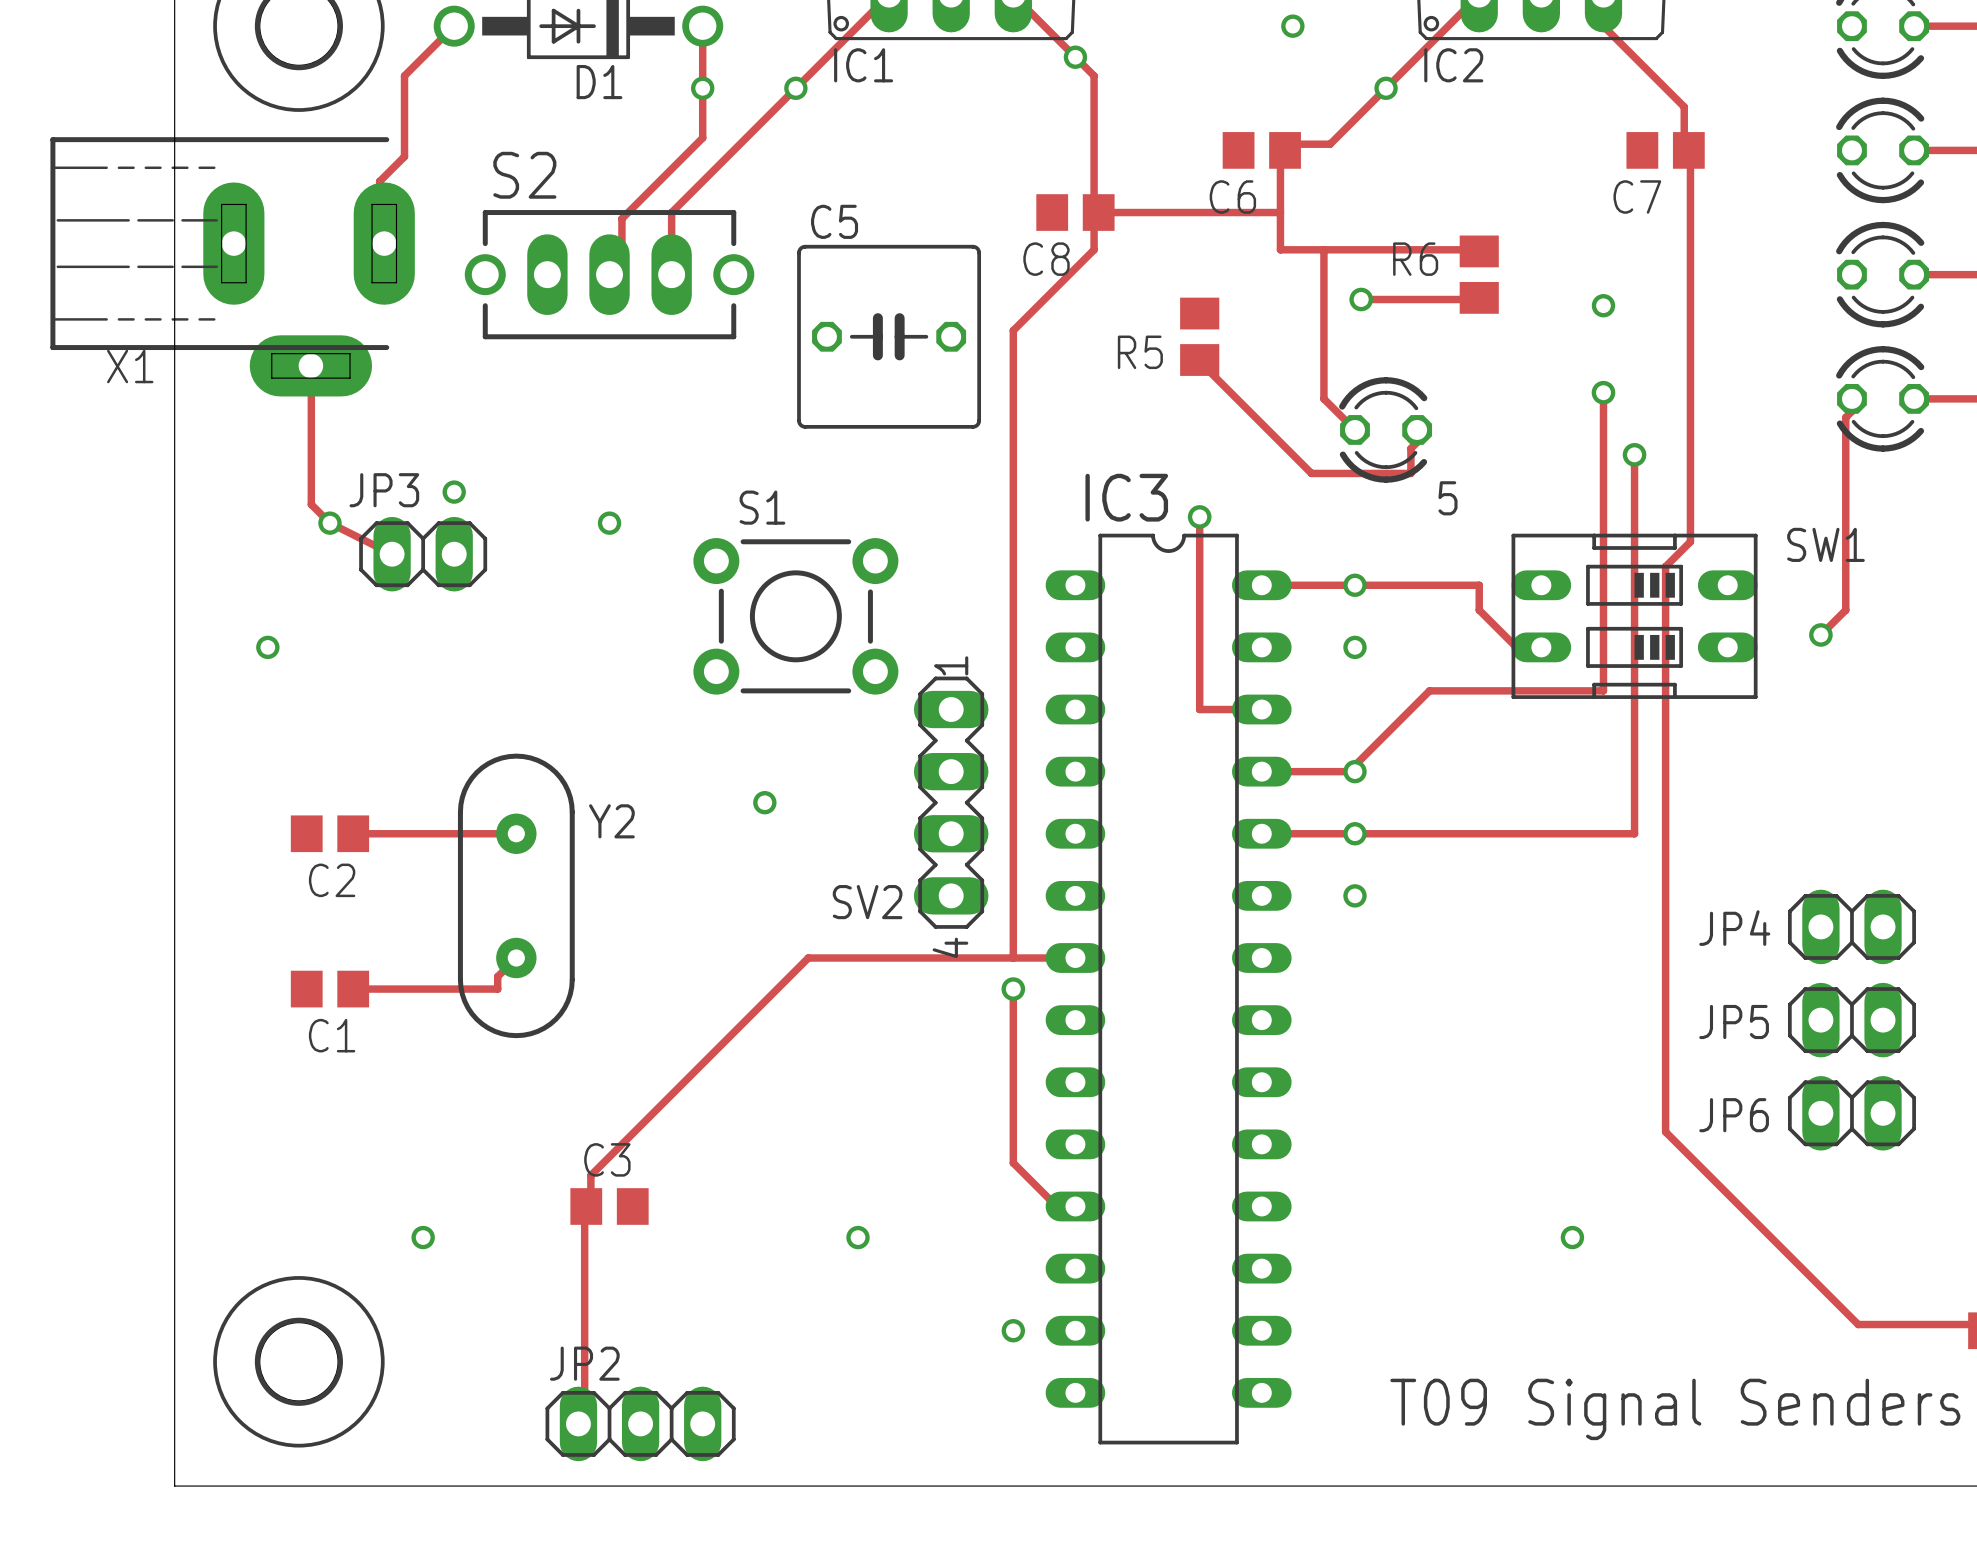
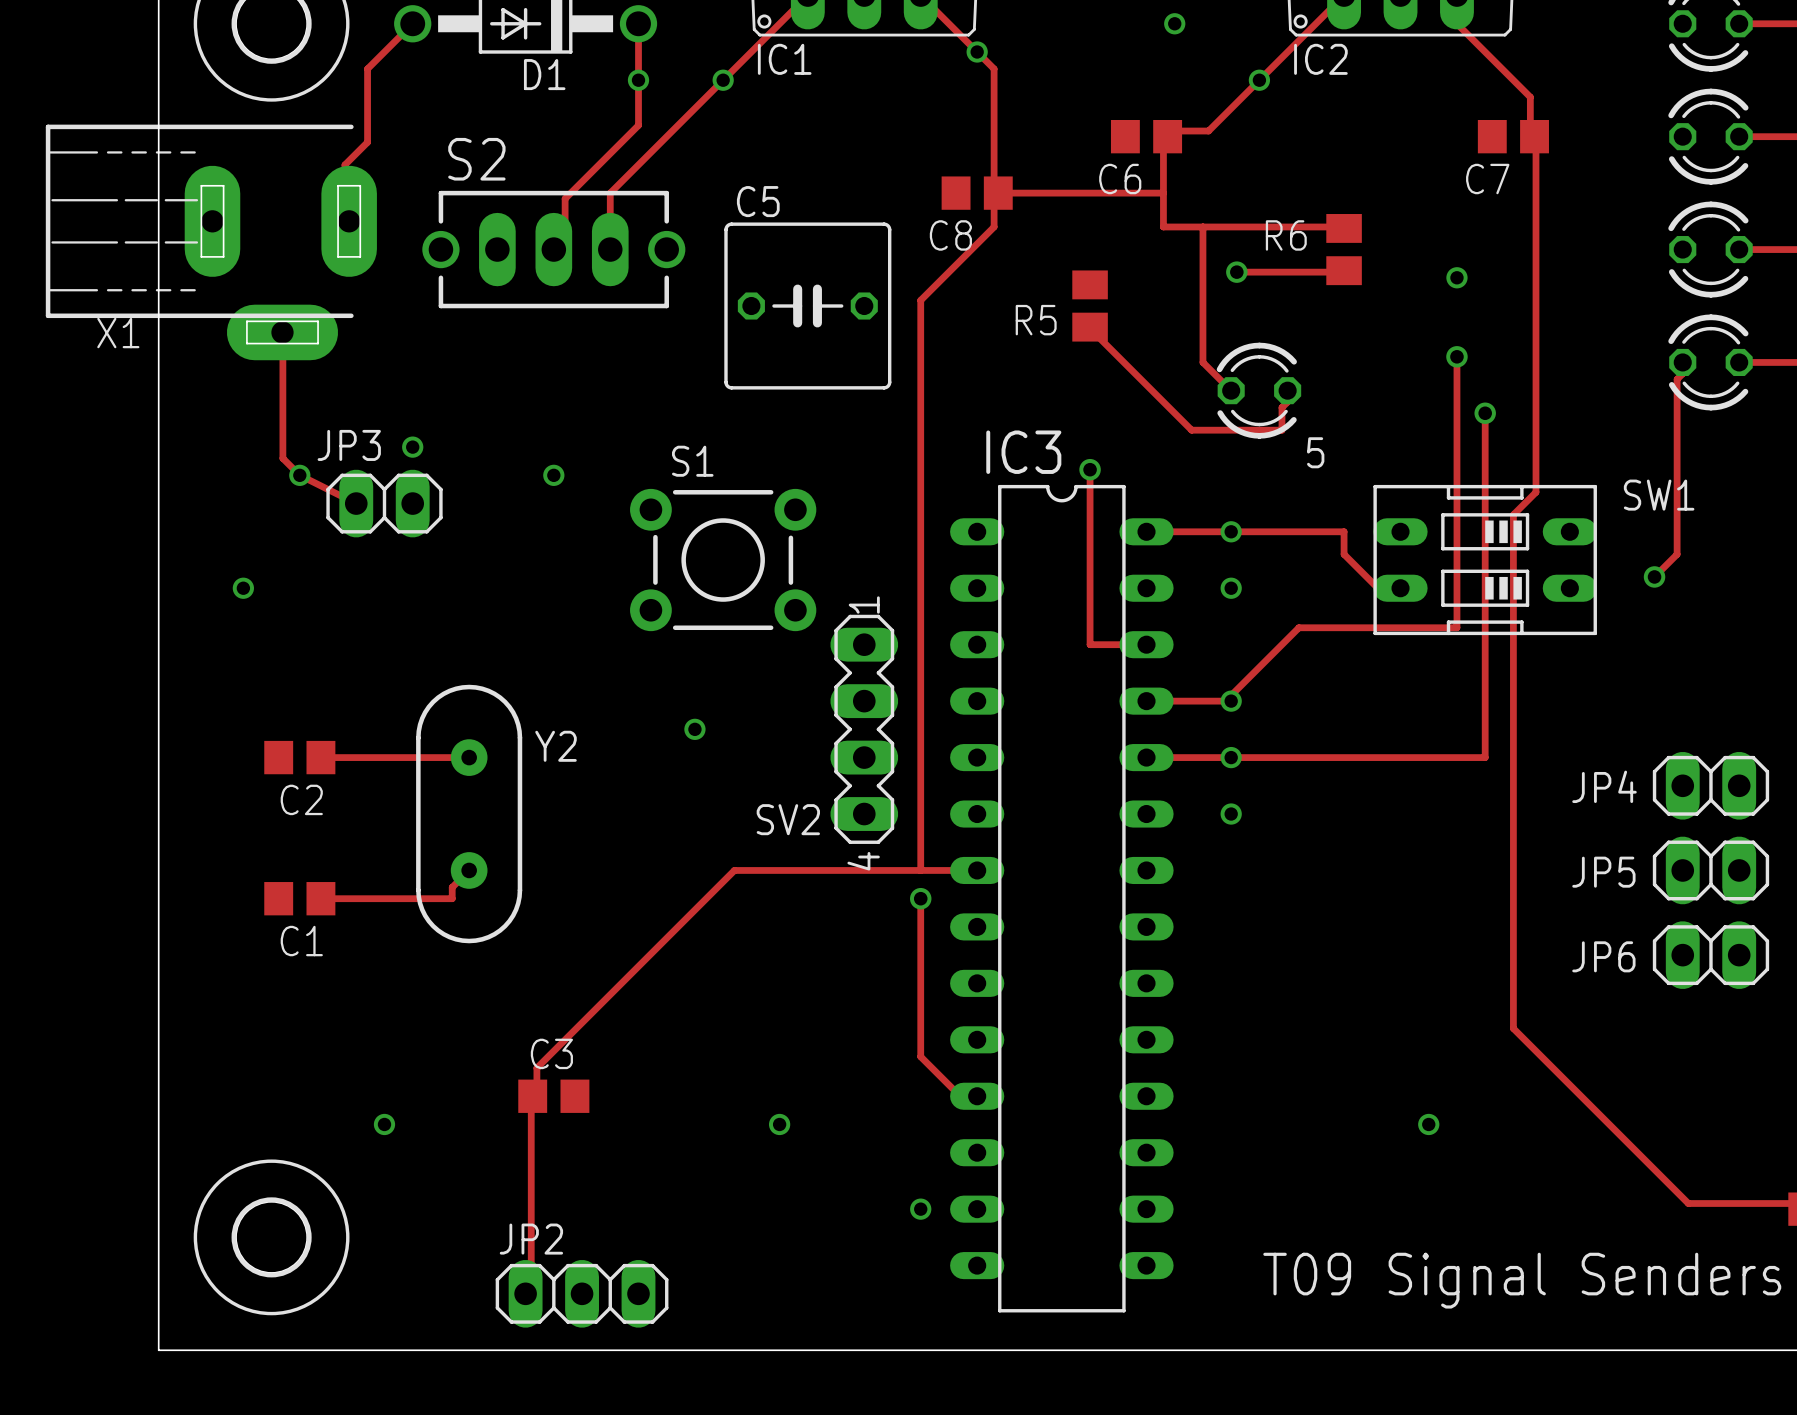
JP4 position: (1851, 926) -> (1710, 785)
JP5 position: (1851, 1020) -> (1710, 870)
JP6 position: (1851, 1113) -> (1710, 955)

